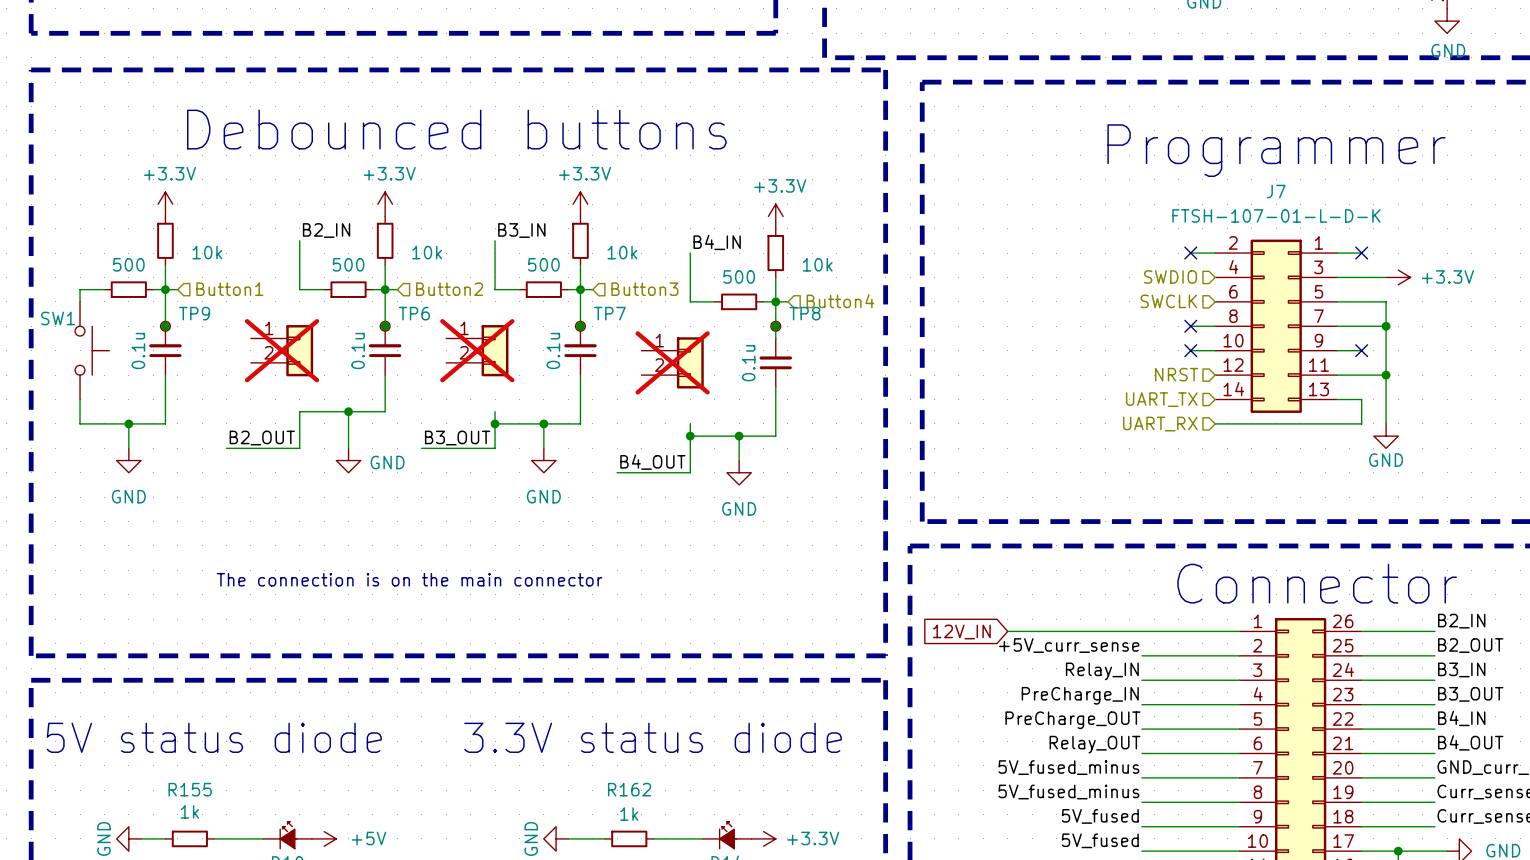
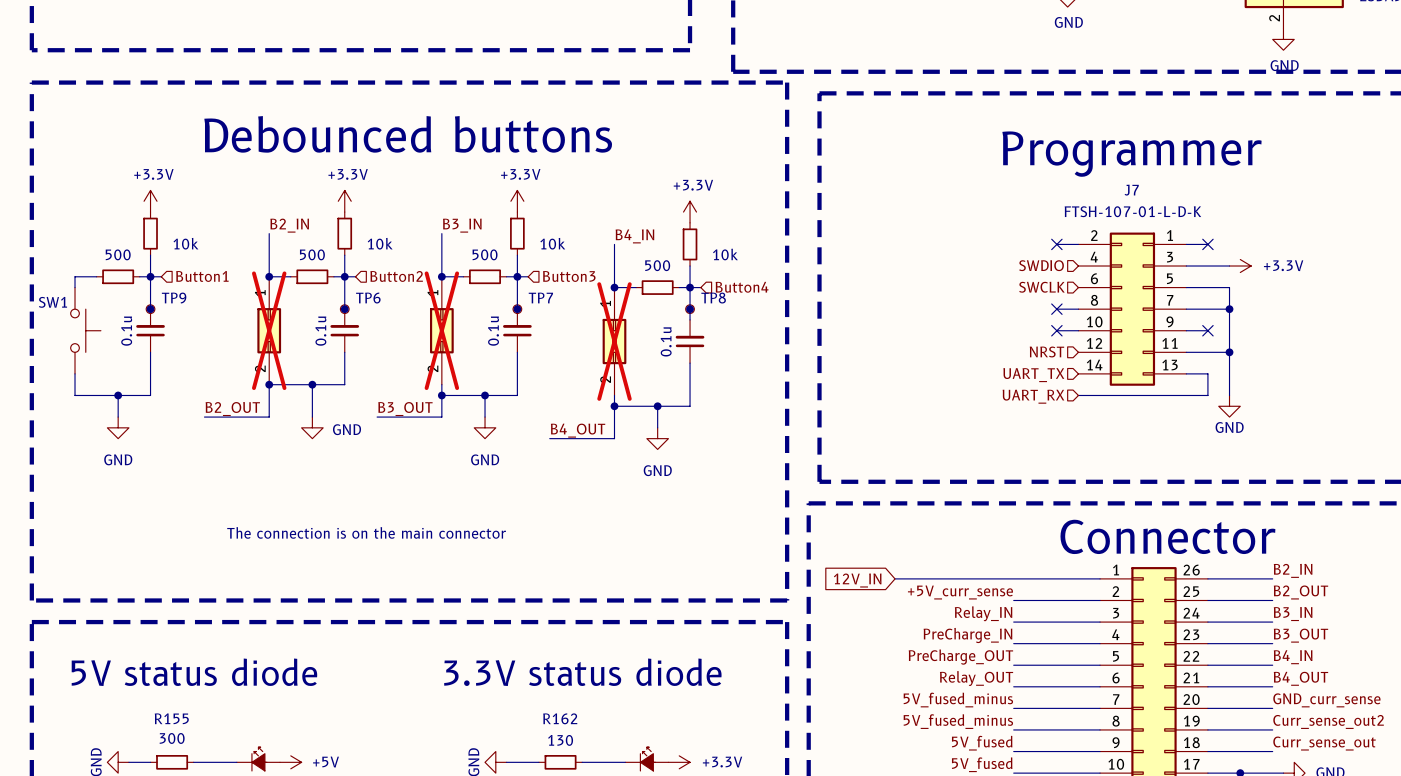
junction: none -> (269, 276)
junction: none -> (441, 276)
junction: none -> (614, 287)
part: (282, 350) -> none
part: none -> (269, 330)
part: (477, 350) -> none
part: none -> (441, 330)
part: (672, 362) -> none
part: none -> (614, 341)
junction: none -> (269, 384)
R155 value: 1k (189, 811) -> 300 (172, 738)
R162 value: 1k (629, 814) -> 130 (560, 740)

